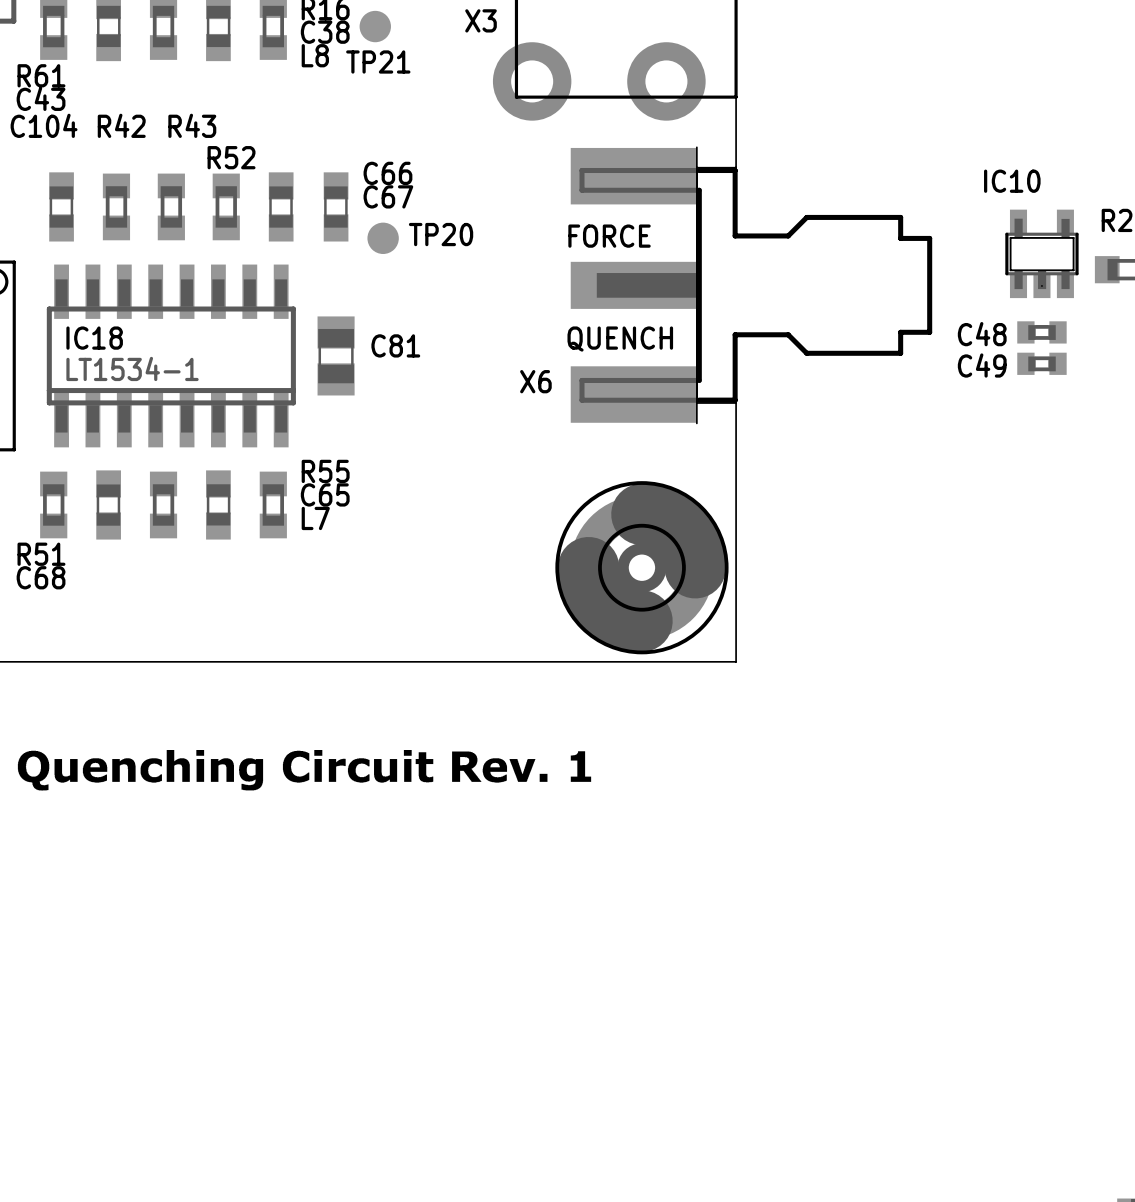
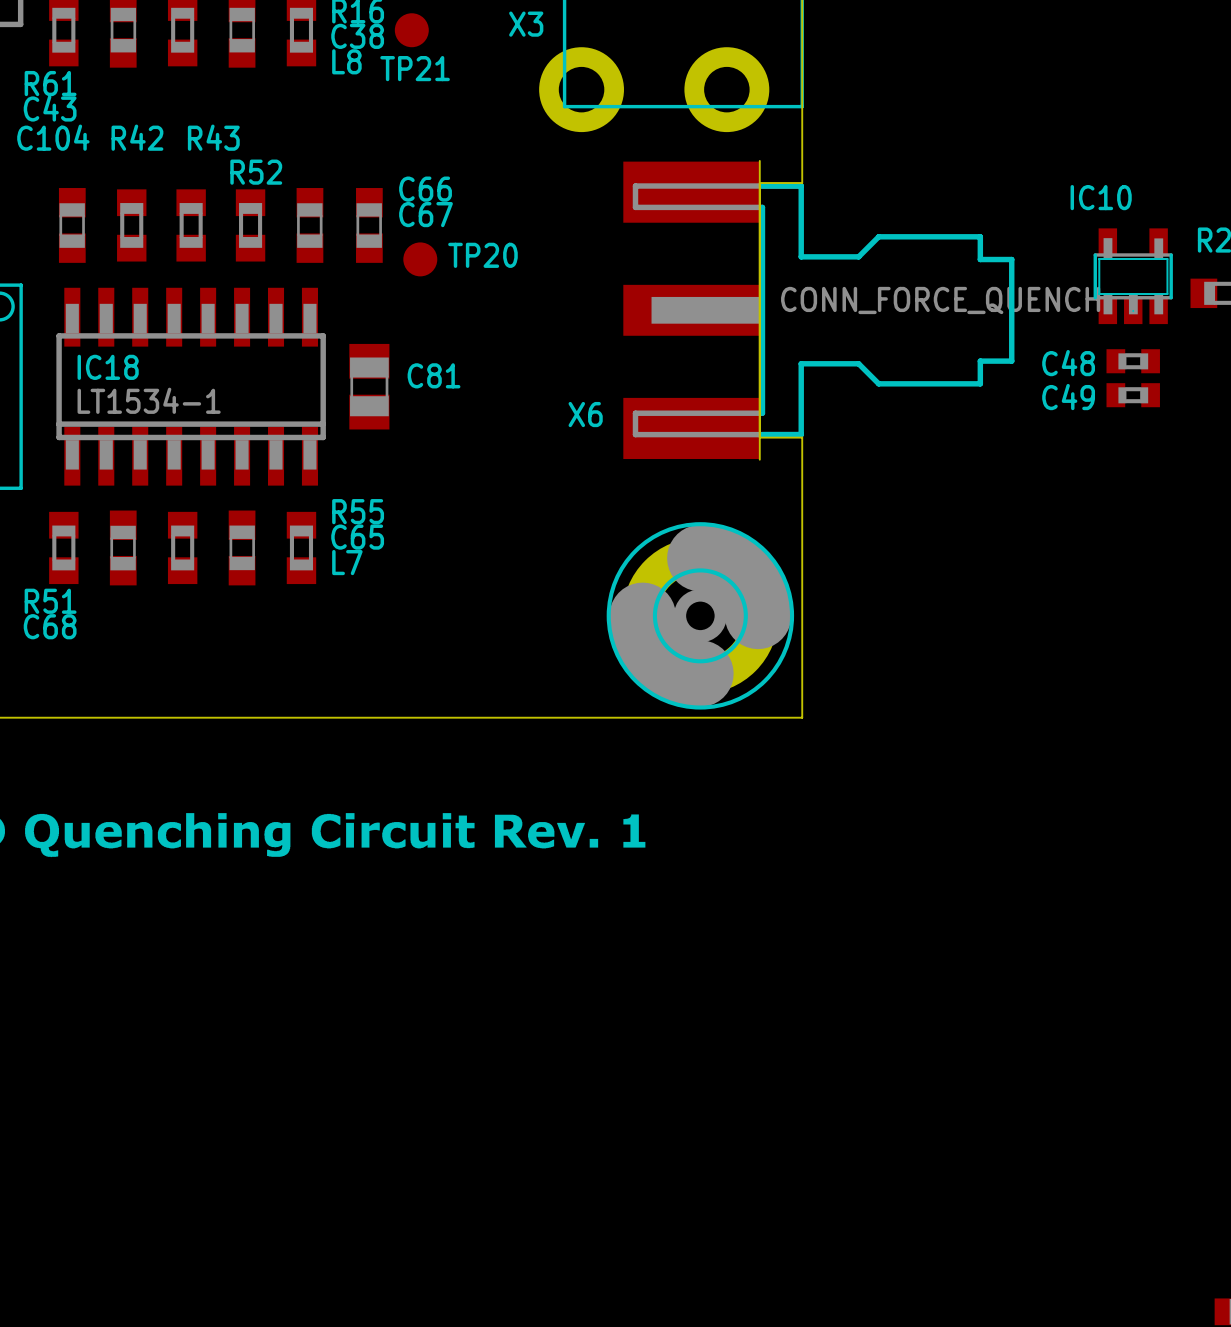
text: FORCE (609, 236) -> none
X6 value: none -> CONN_FORCE_QUENCH (940, 300)
text: QUENCH (620, 339) -> none

